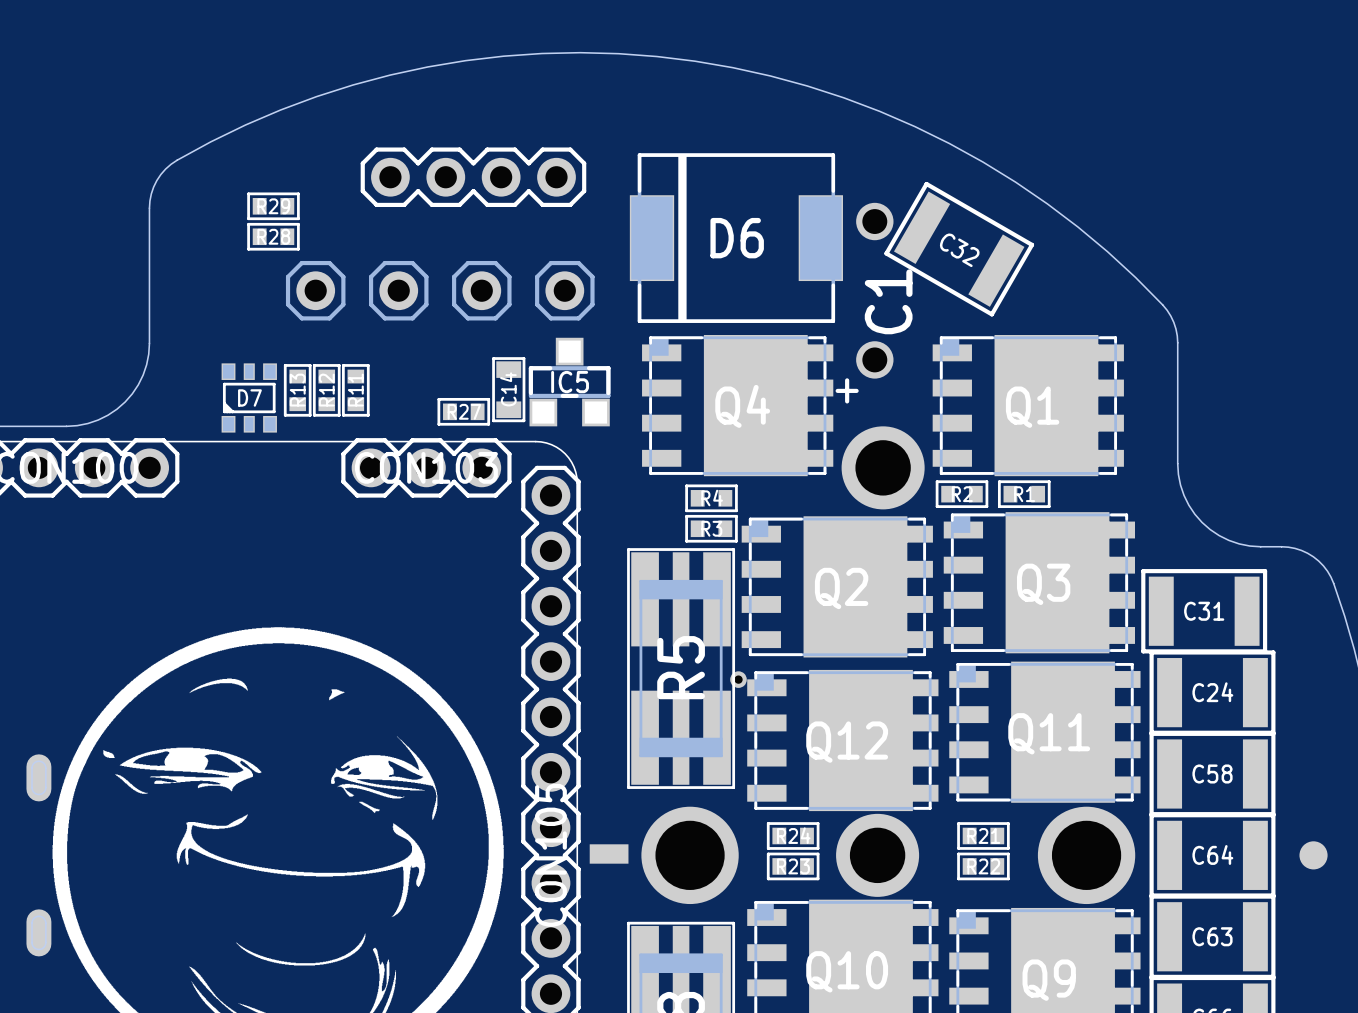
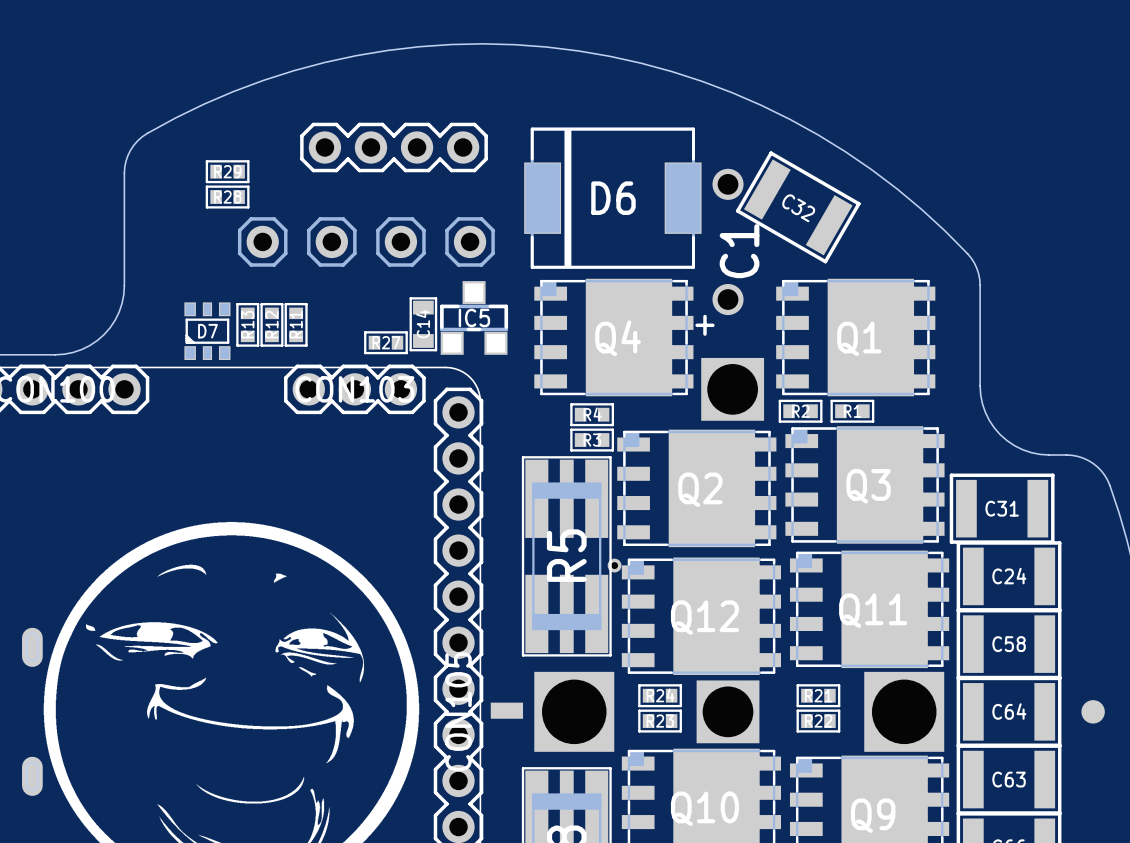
part footprint: [841, 426, 925, 510] -> [701, 357, 765, 421]
part footprint: [641, 806, 739, 905] -> [534, 671, 615, 752]
part footprint: [1037, 806, 1136, 905] -> [864, 671, 945, 752]
part footprint: [836, 813, 920, 897] -> [696, 680, 760, 744]

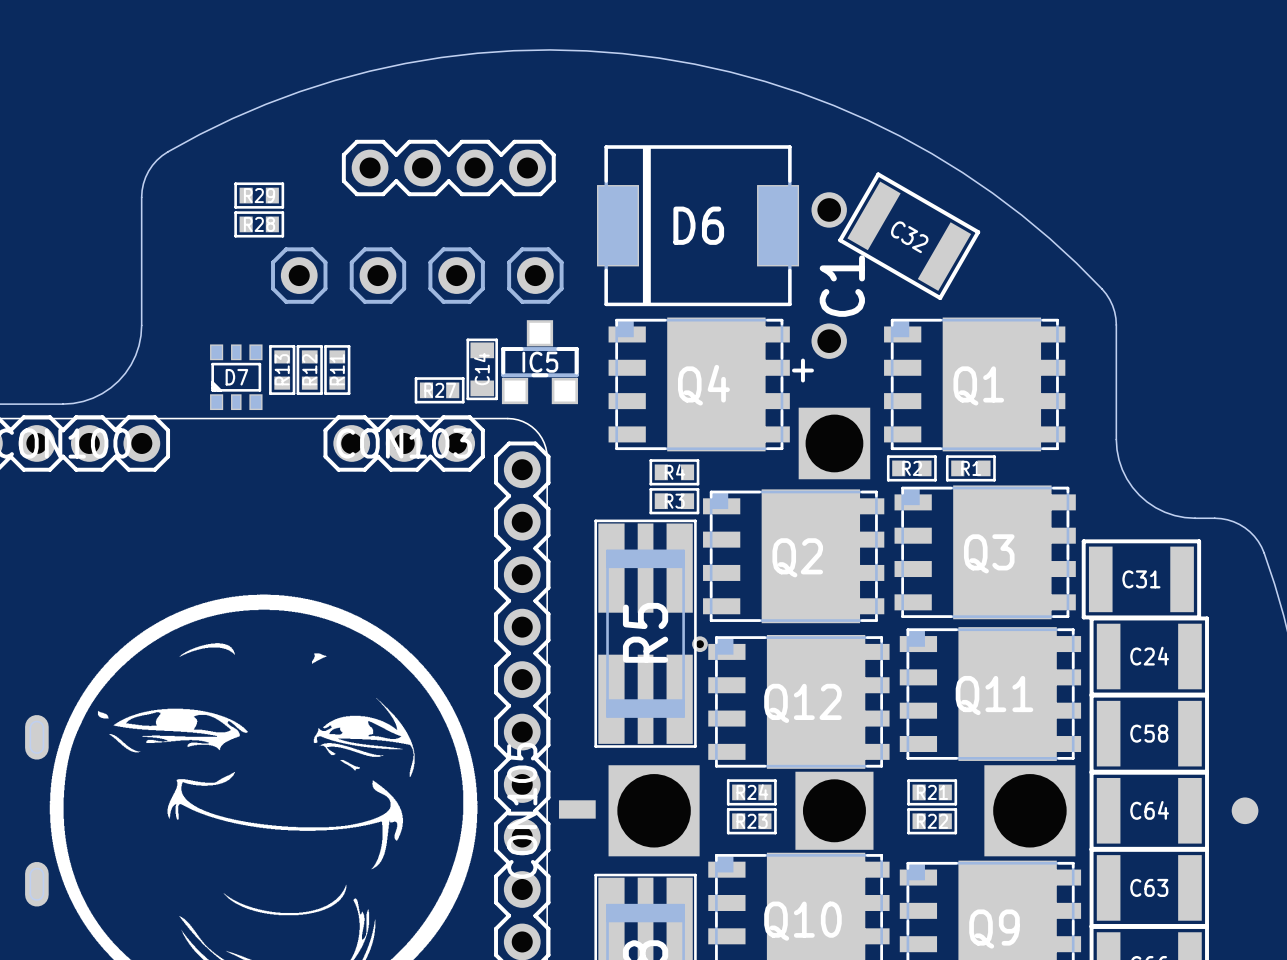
part footprint: [696, 680, 760, 744] -> [795, 771, 874, 850]

